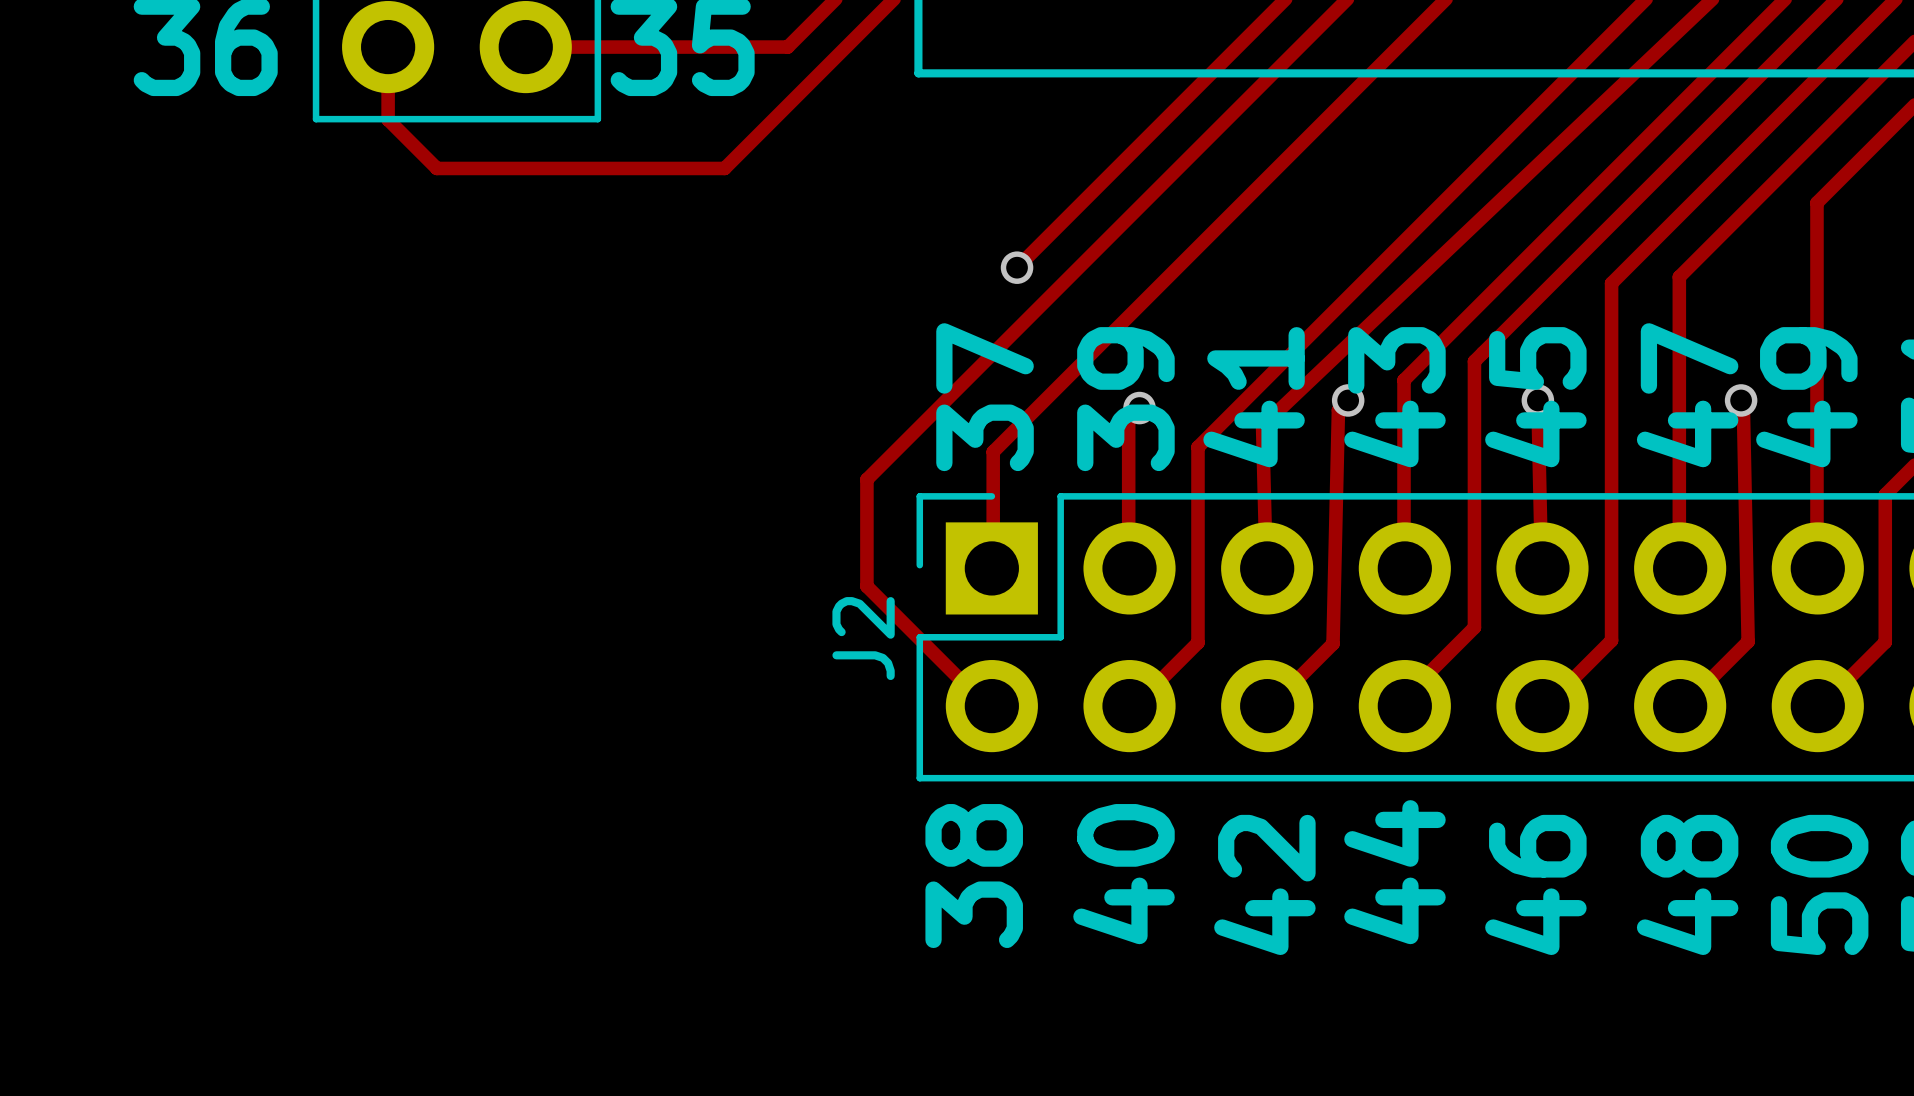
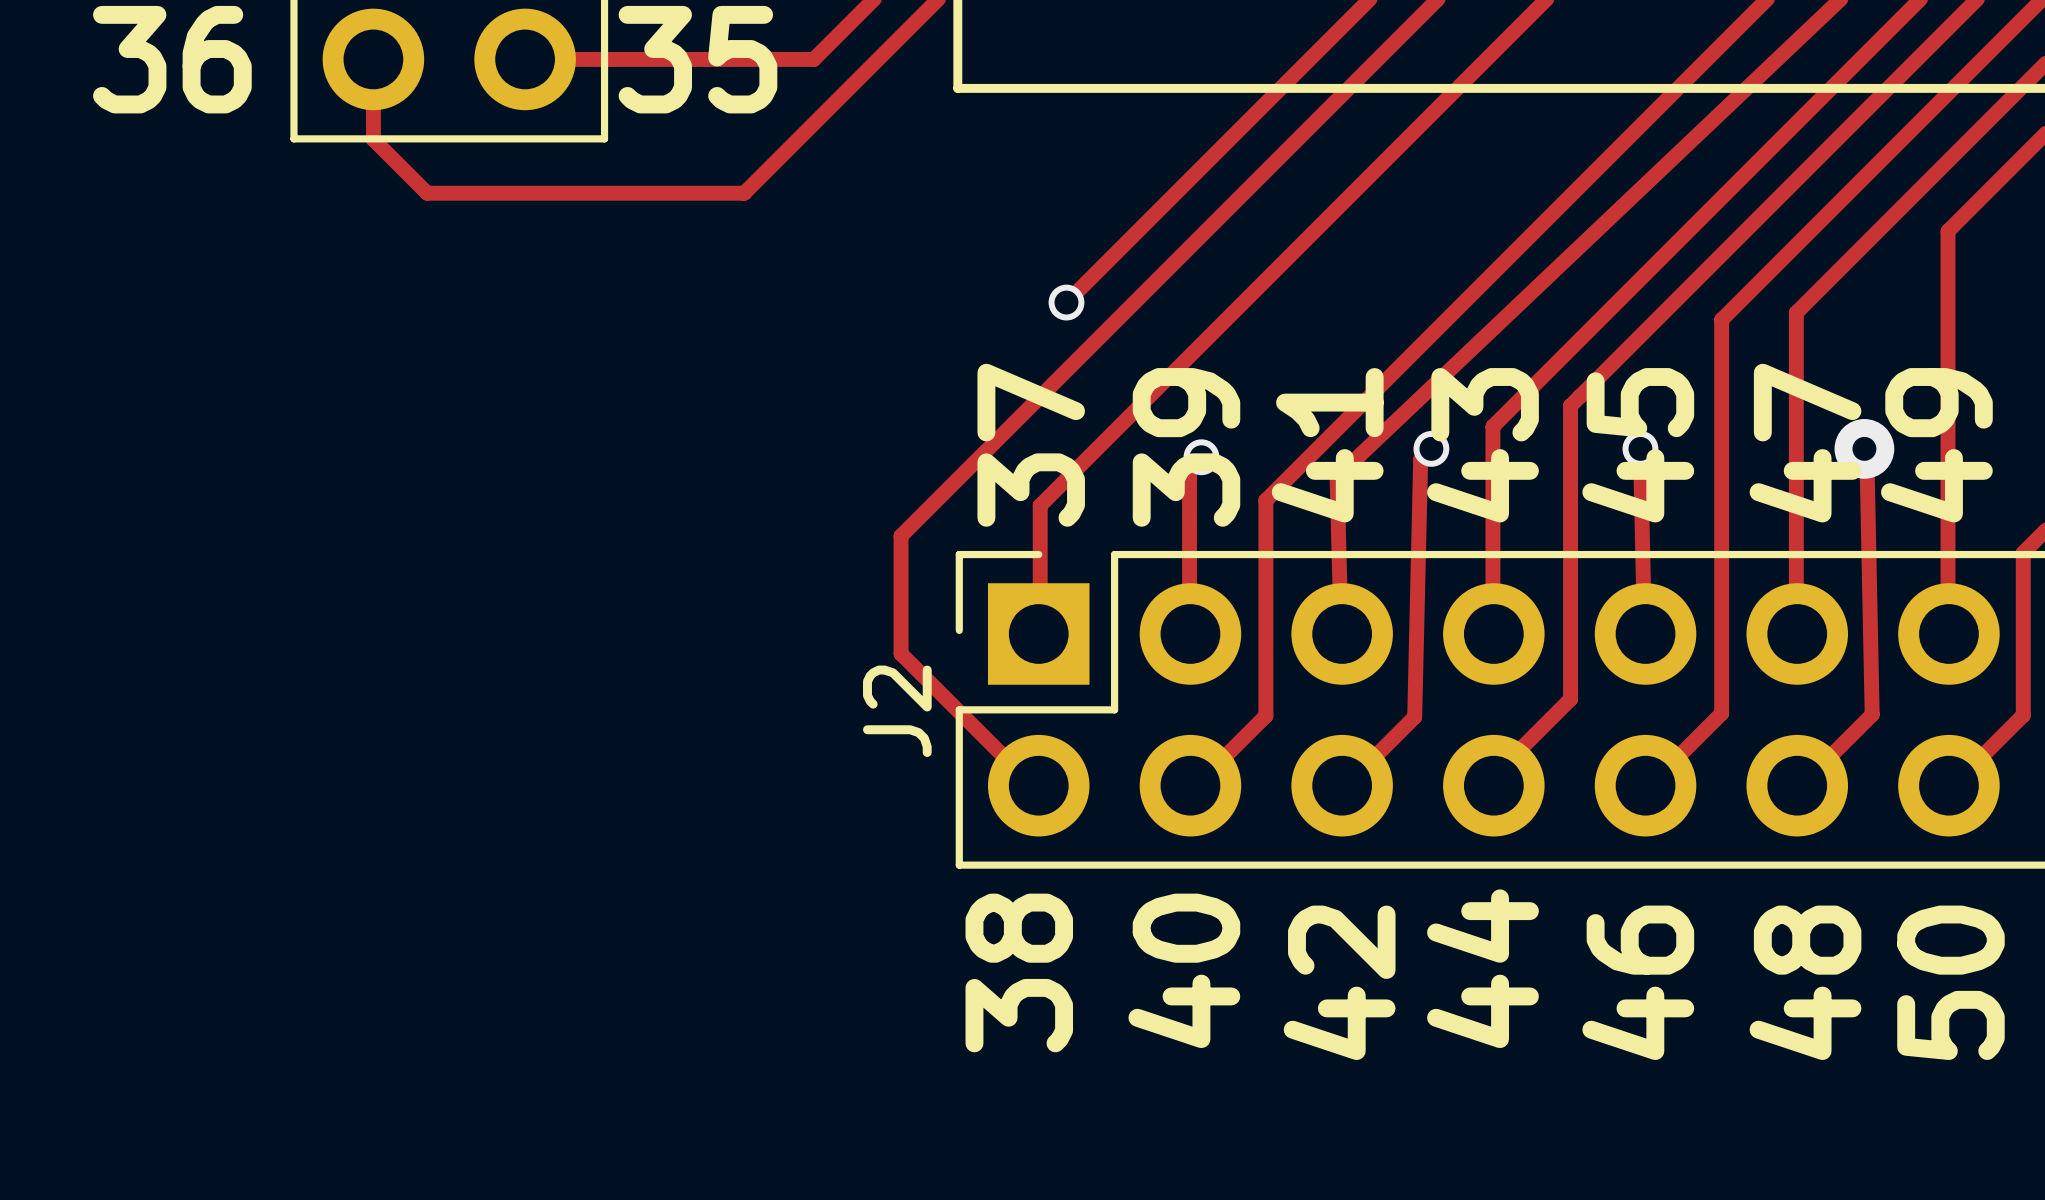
via size: [1724, 384, 1758, 417] -> [1834, 419, 1895, 479]

